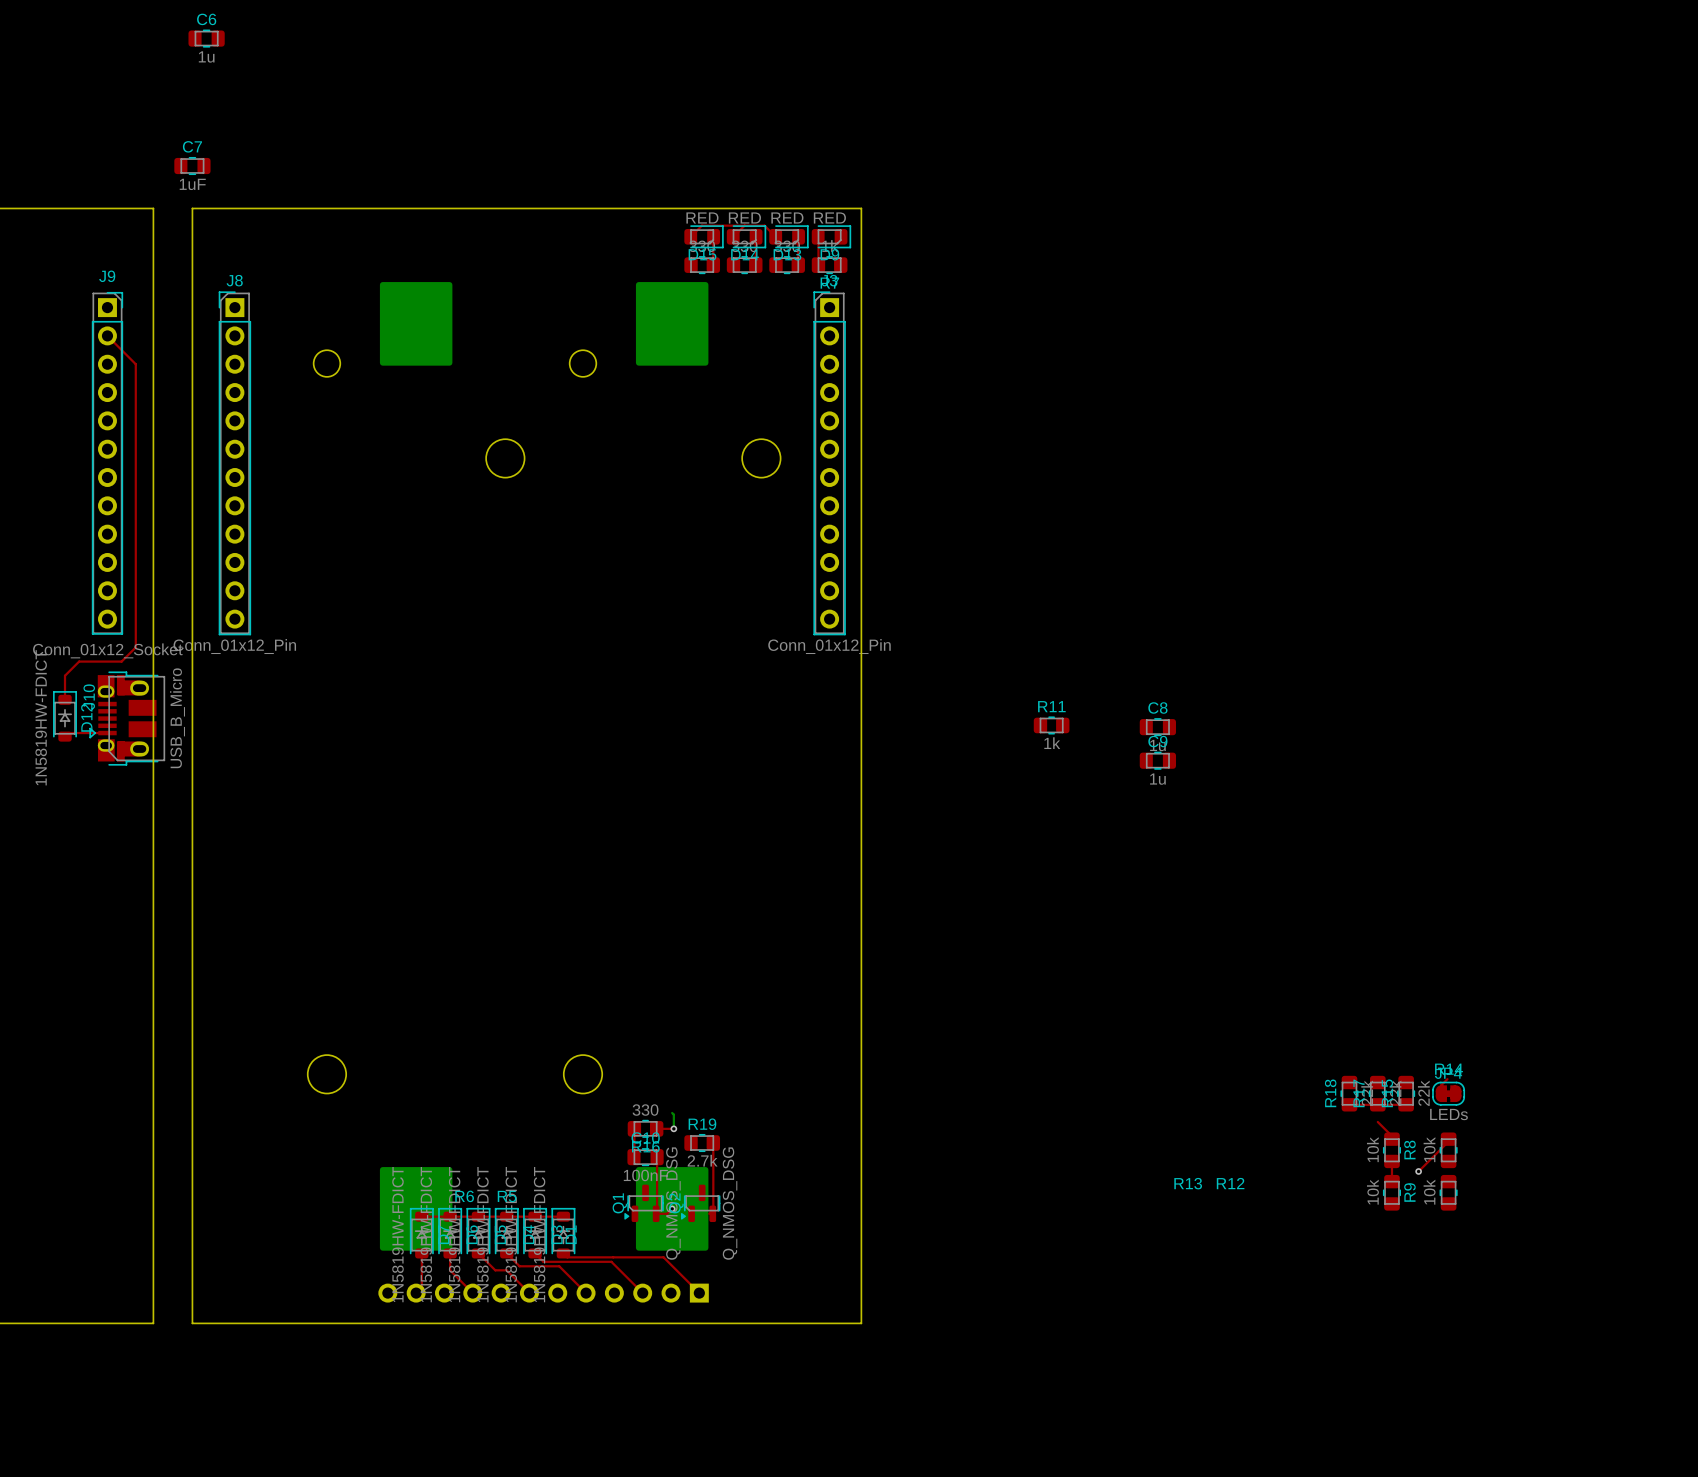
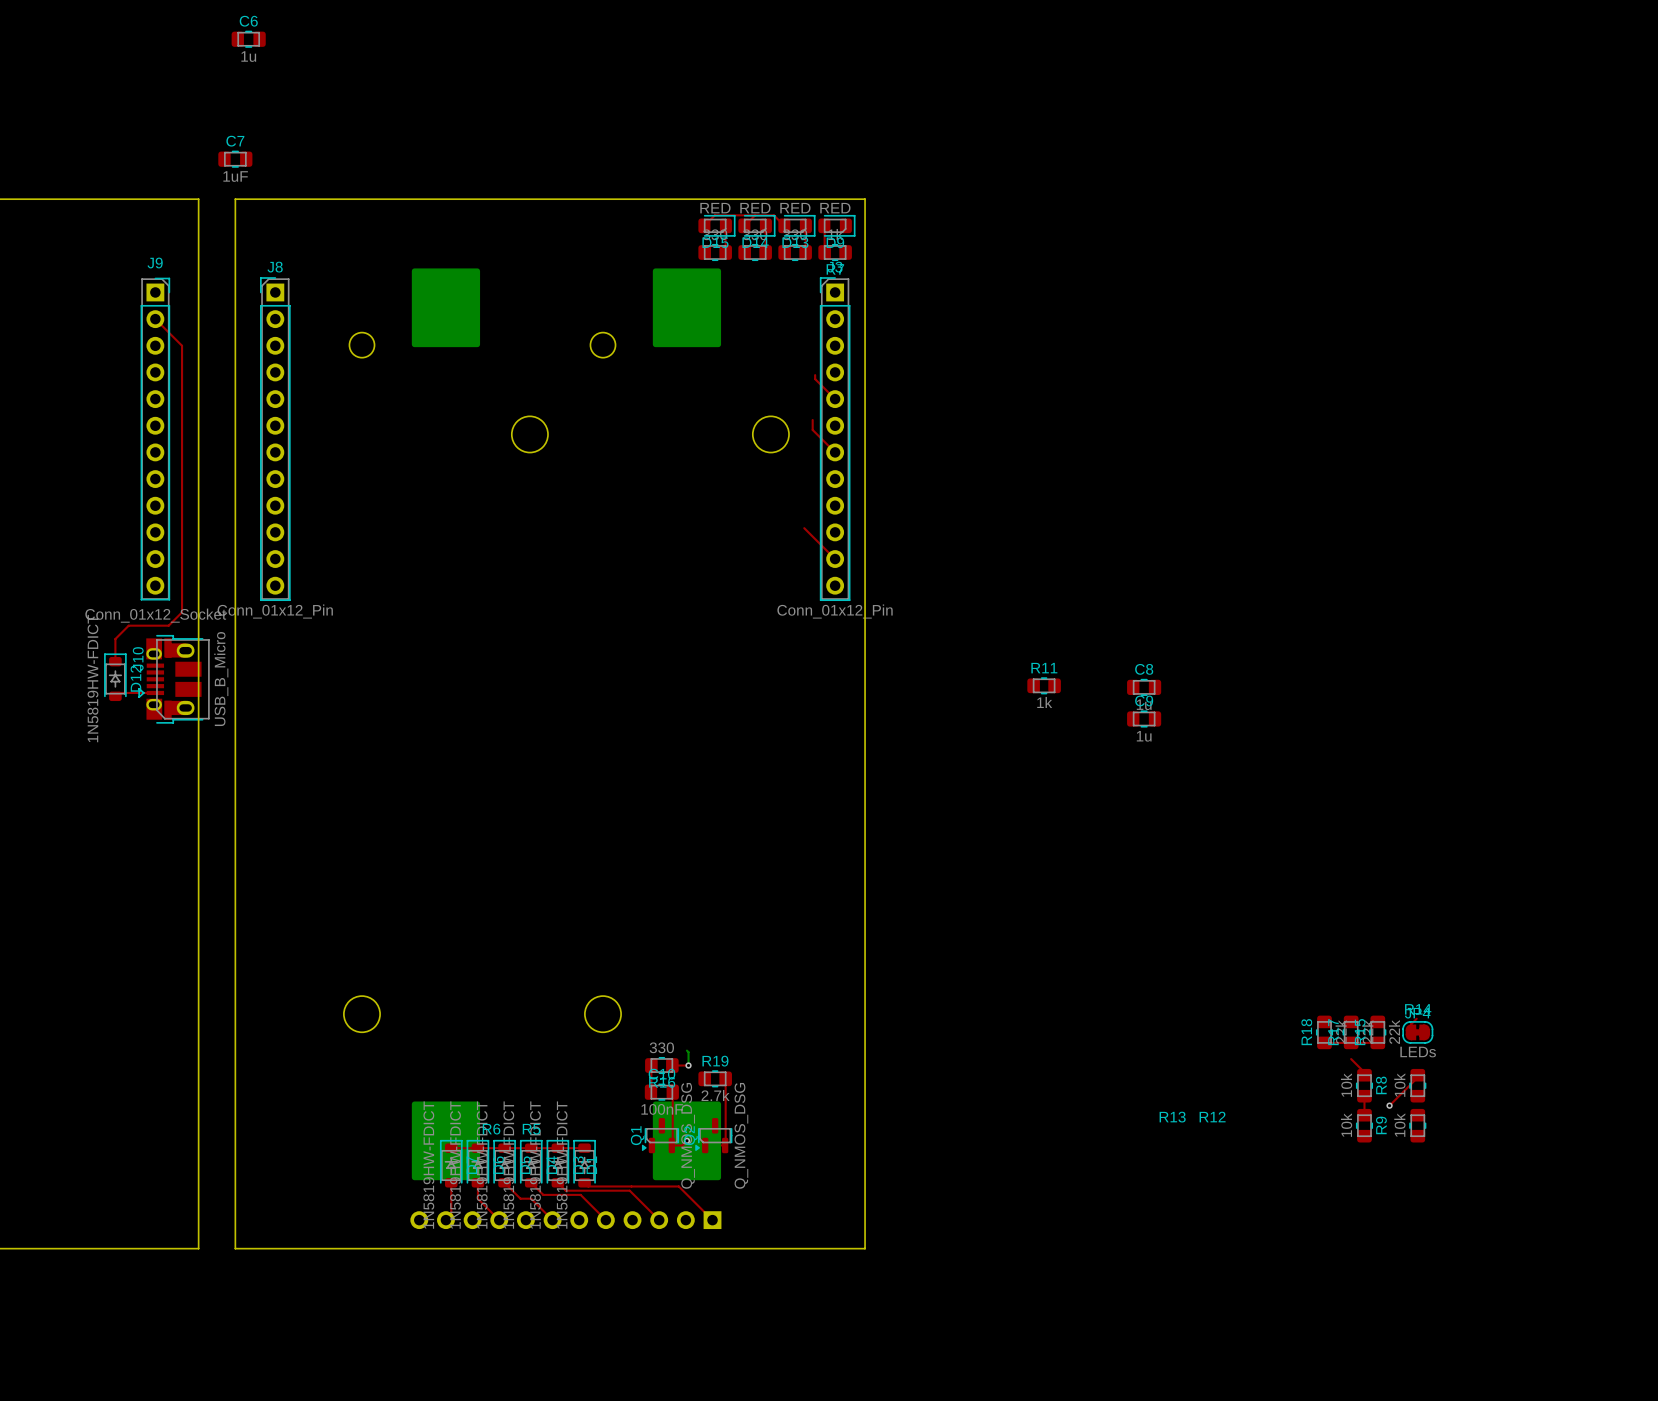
top track: none -> (815, 375) (815, 379) (835, 399)
top track: none -> (812, 420) (812, 429) (835, 452)
top track: none -> (804, 528) (835, 559)

